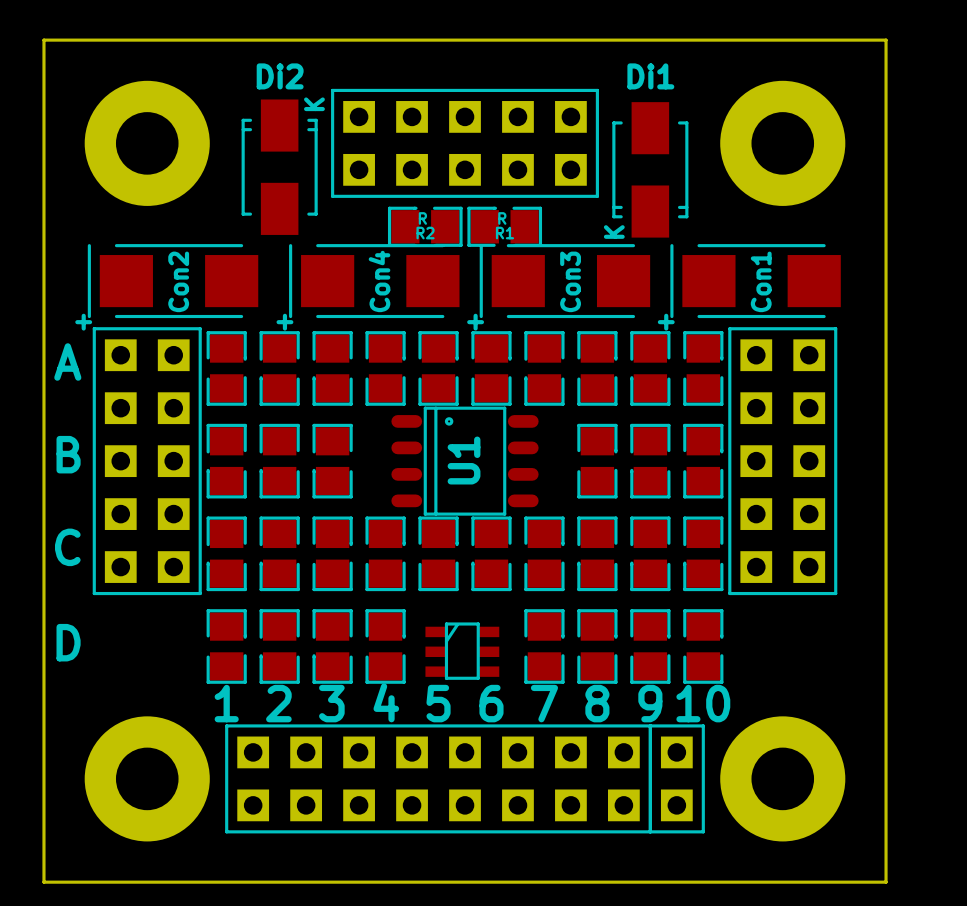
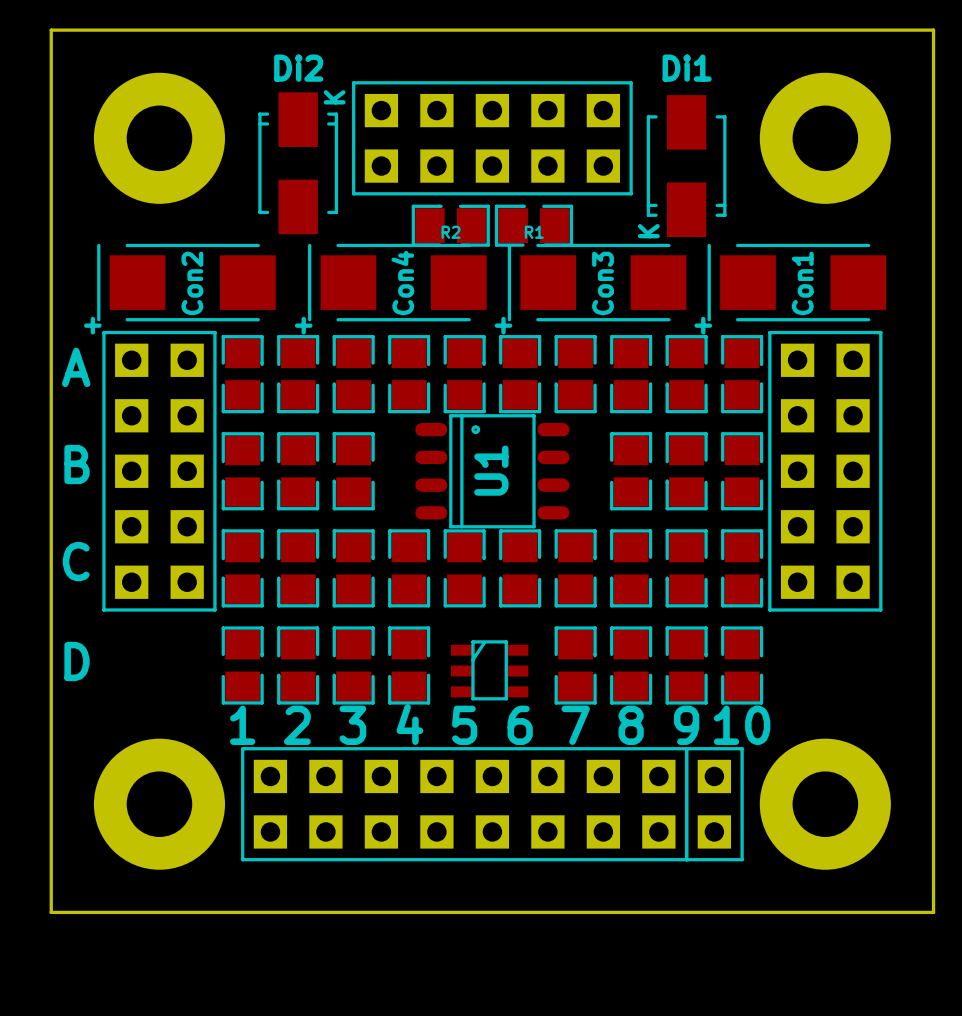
R2 value: R (422, 218) -> none
R1 value: R (502, 218) -> none

